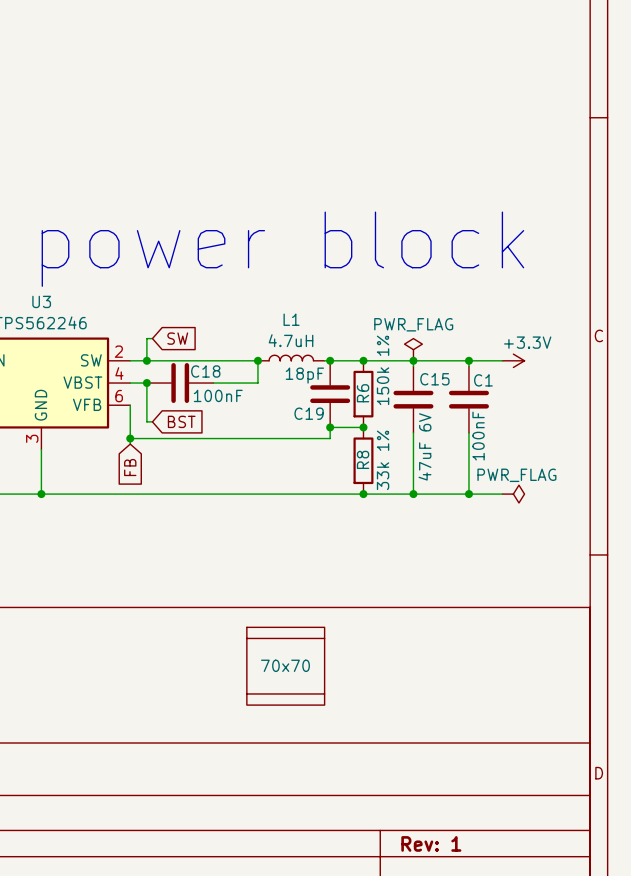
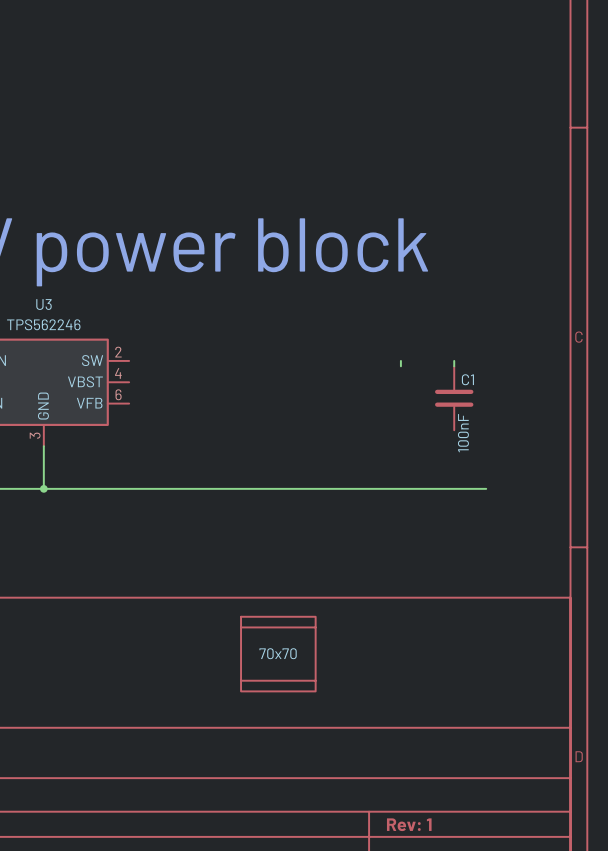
wire: (152, 338) (146, 338) (146, 360) -> none
global label: SW (177, 338) -> none
power symbol: PWR_FLAG (413, 349) -> none
L1: 4.7uH (291, 358) -> none
wire: (130, 360) (257, 360) (257, 383) (213, 383) -> none
junction: (146, 360) -> none
junction: (257, 360) -> none
wire: (324, 360) (502, 360) -> none
junction: (330, 360) -> none
junction: (363, 360) -> none
junction: (413, 360) -> none
junction: (468, 360) -> none
power symbol: +3.3V (513, 360) -> none
wire: (130, 383) (146, 383) (146, 421) (152, 421) -> none
junction: (146, 383) -> none
C18: 100nF (180, 383) -> none
C19: 18pF (330, 394) -> none
R6: 150k 1% (363, 394) -> none
C15: 47uF 6V (413, 399) -> none
wire: (130, 405) (130, 444) -> none
global label: BST (181, 421) -> none
junction: (330, 427) -> none
wire: (363, 427) (330, 427) (330, 438) (130, 438) -> none
junction: (363, 427) -> none
wire: (413, 432) (413, 494) -> none
wire: (468, 432) (468, 494) -> none
junction: (130, 438) -> none
R8: 33k 1% (363, 460) -> none
global label: FB (130, 467) -> none
junction: (363, 494) -> none
junction: (413, 494) -> none
junction: (468, 494) -> none
power symbol: PWR_FLAG (513, 494) -> none

